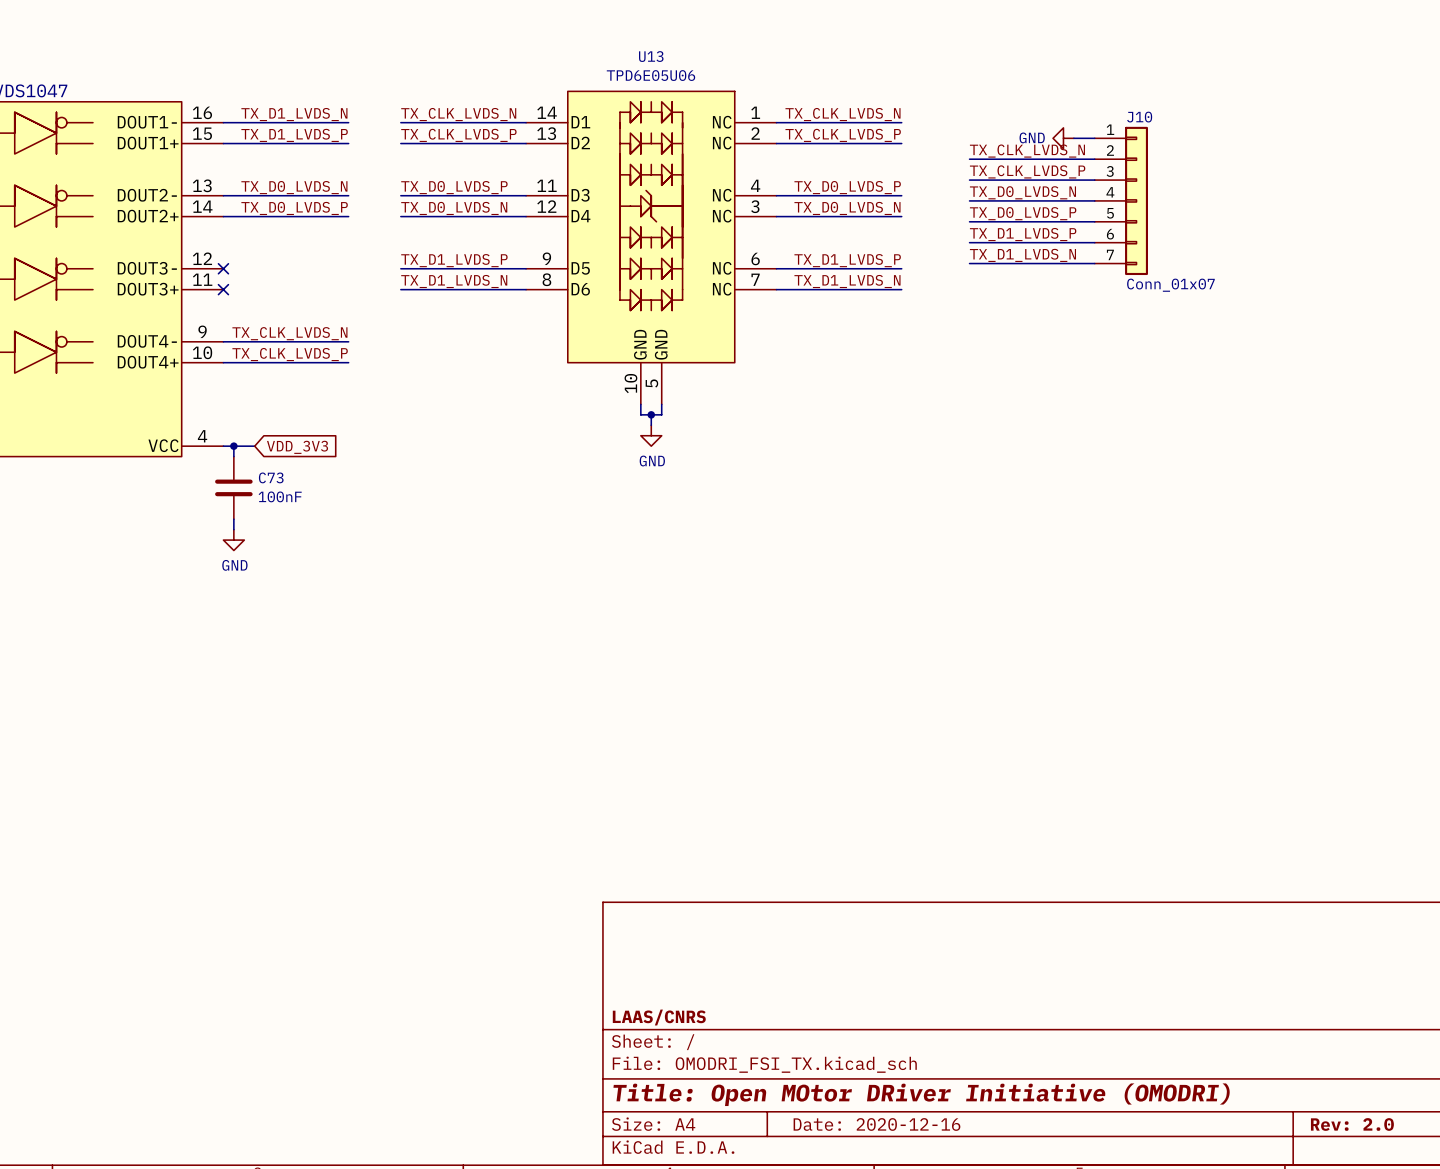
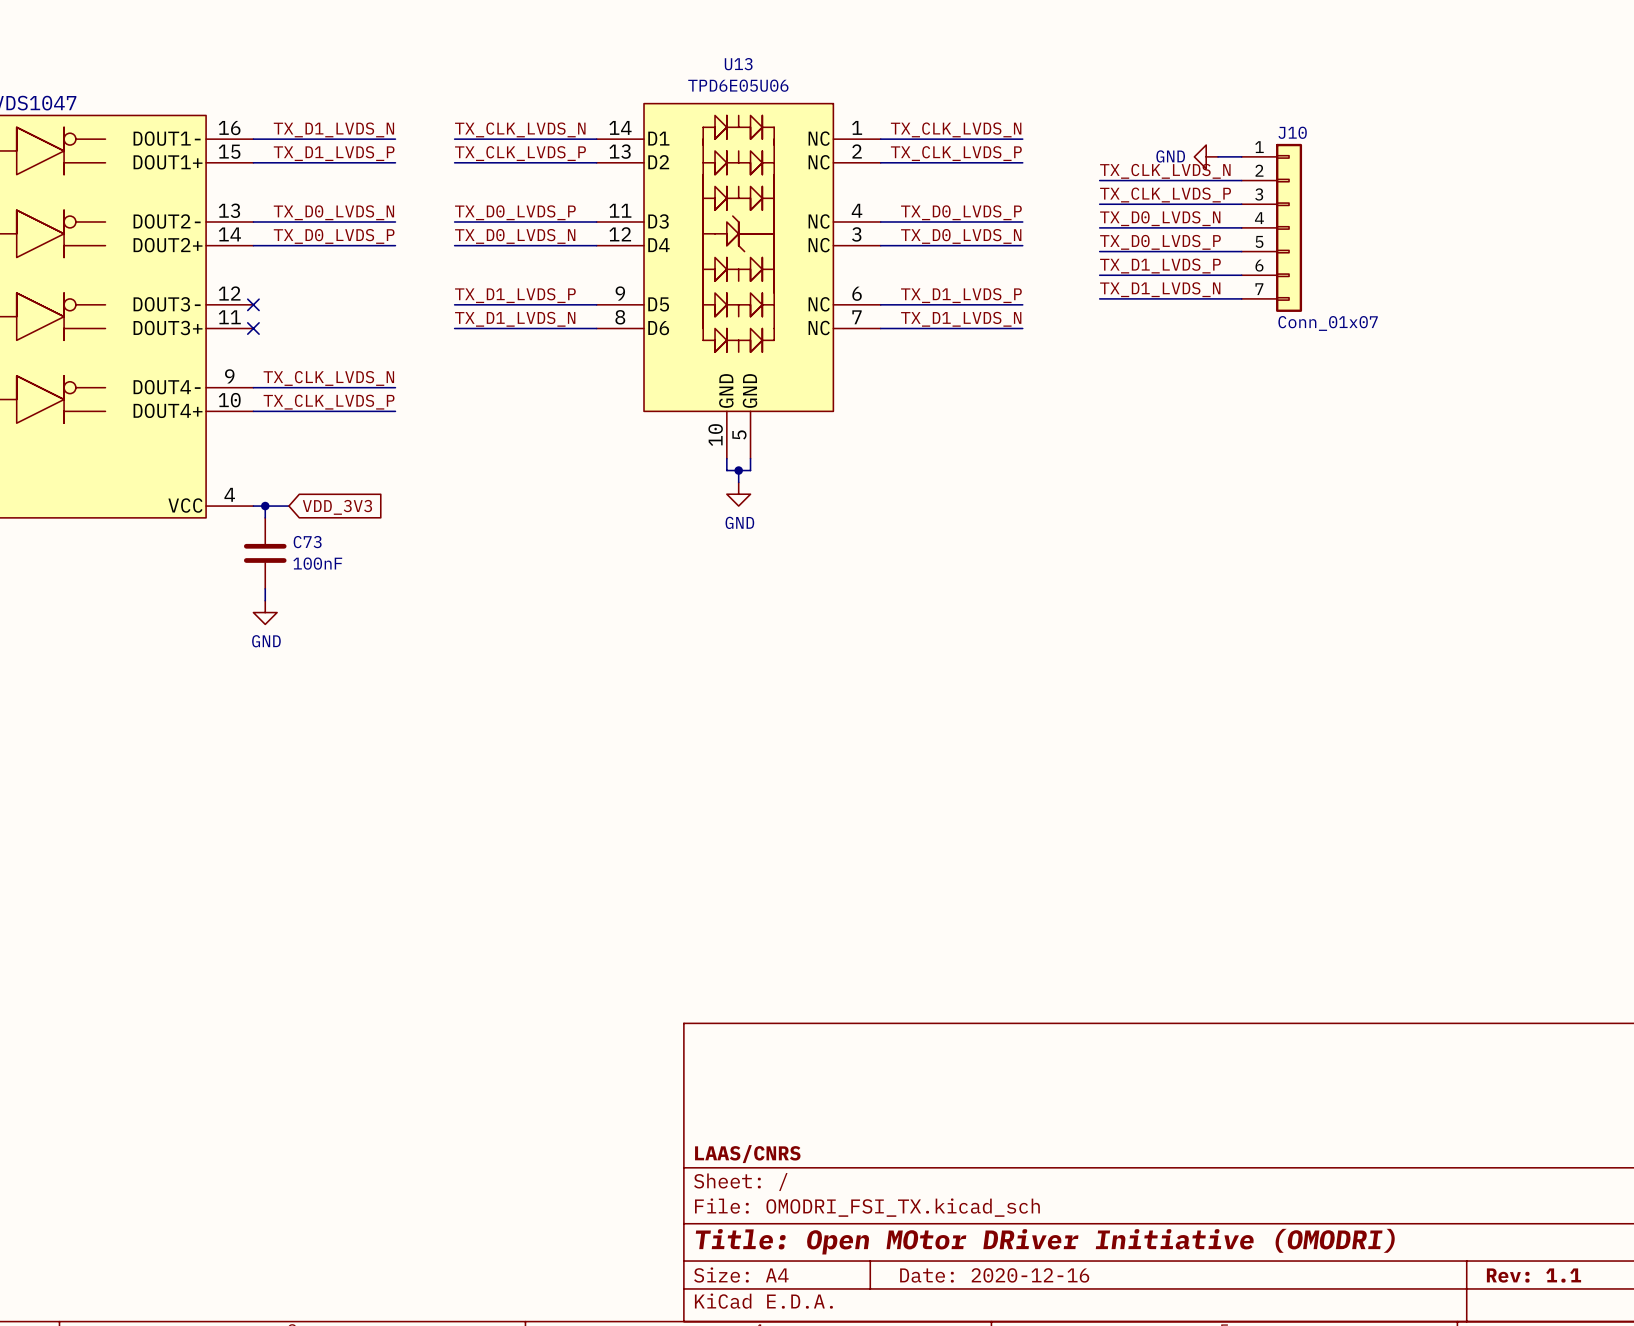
title block: Rev: 2.0 (1352, 1124) -> Rev: 1.1 (1533, 1275)

